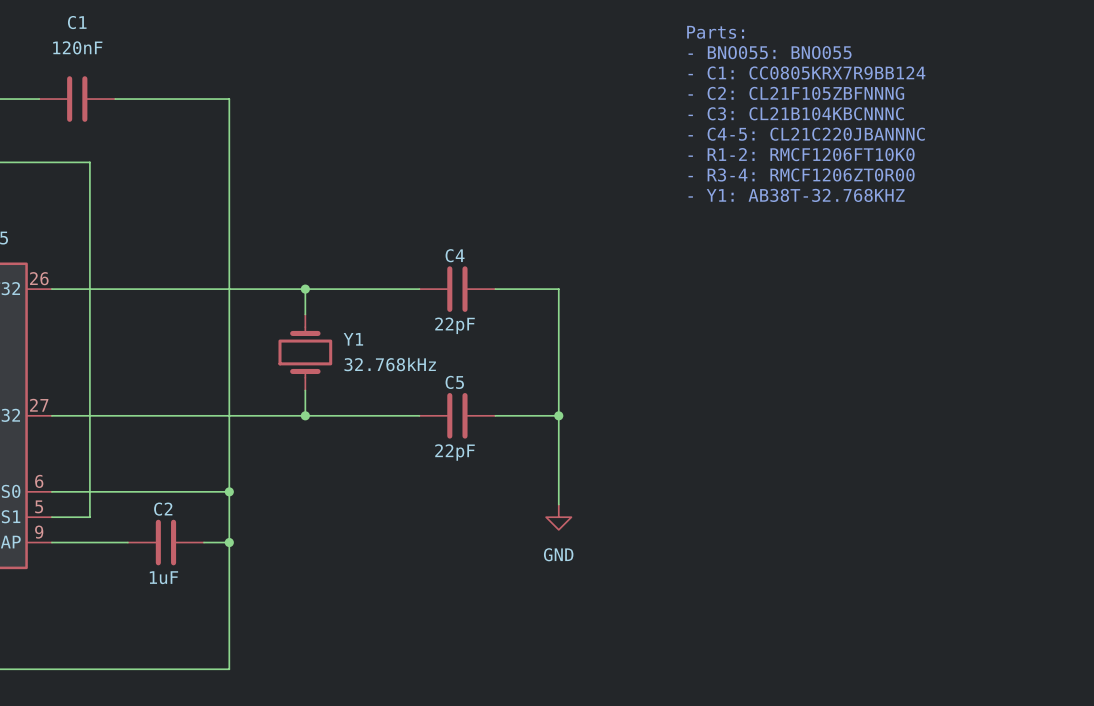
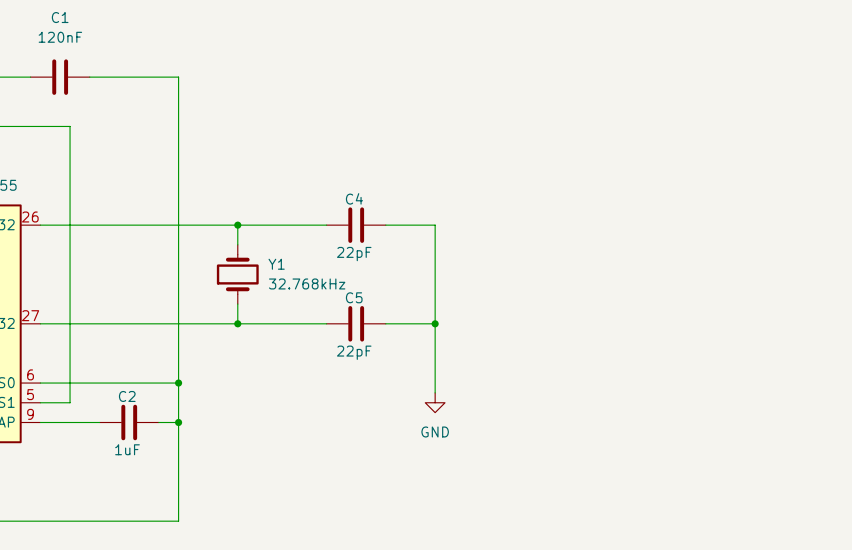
text: Parts: (715, 32) -> none
text: - BNO055: BNO055 (770, 52) -> none
text: - C1: CC0805KRX7R9BB124 (806, 73) -> none
text: - C2: CL21F105ZBFNNNG (796, 93) -> none
text: - C3: CL21B104KBCNNNC (796, 113) -> none
text: - C4-5: CL21C220JBANNNC (806, 134) -> none
text: - R1-2: RMCF1206FT10K0 (801, 154) -> none
text: - R3-4: RMCF1206ZT0R00 (801, 175) -> none
text: - Y1: AB38T-32.768KHZ (796, 195) -> none

